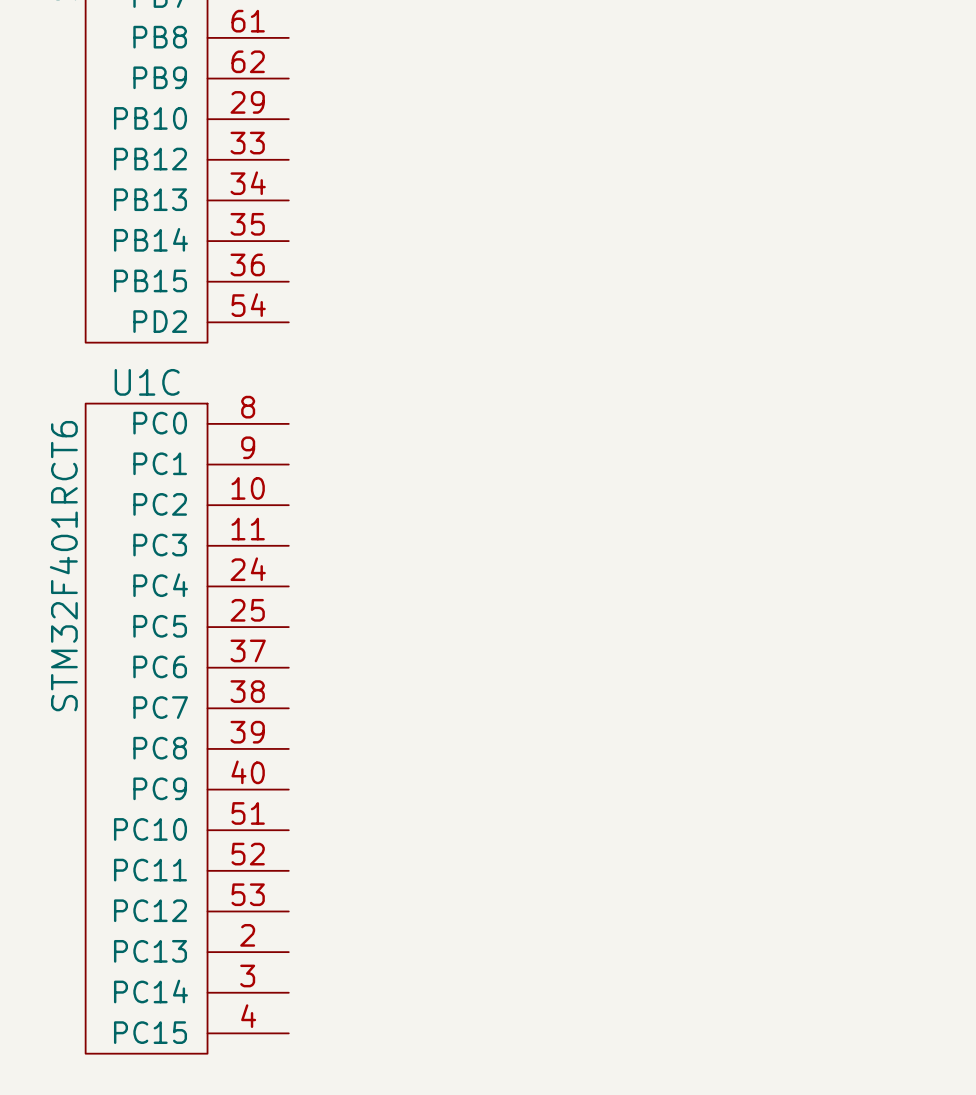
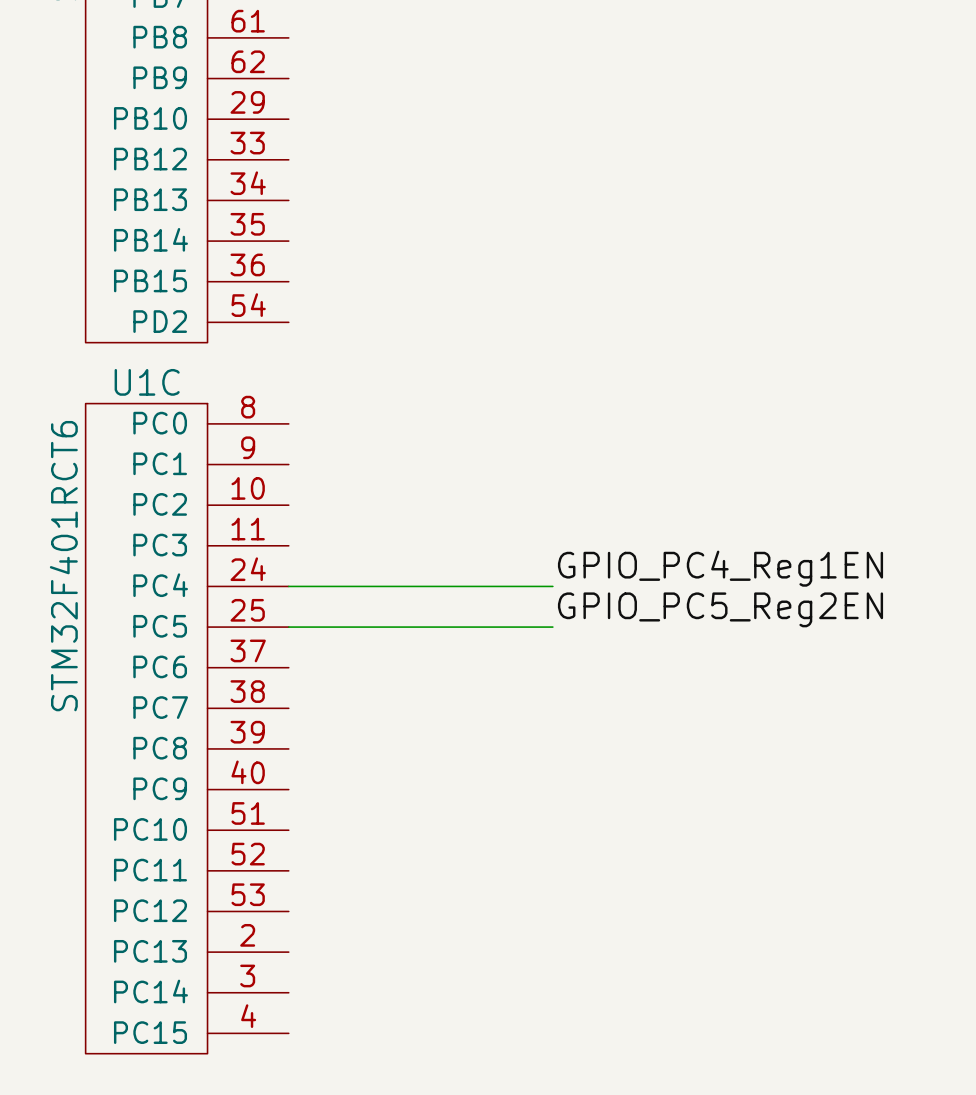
label: none -> GPIO_PC4_Reg1EN (720, 568)
wire: none -> (288, 586) (552, 586)
label: none -> GPIO_PC5_Reg2EN (720, 609)
wire: none -> (288, 627) (552, 627)

